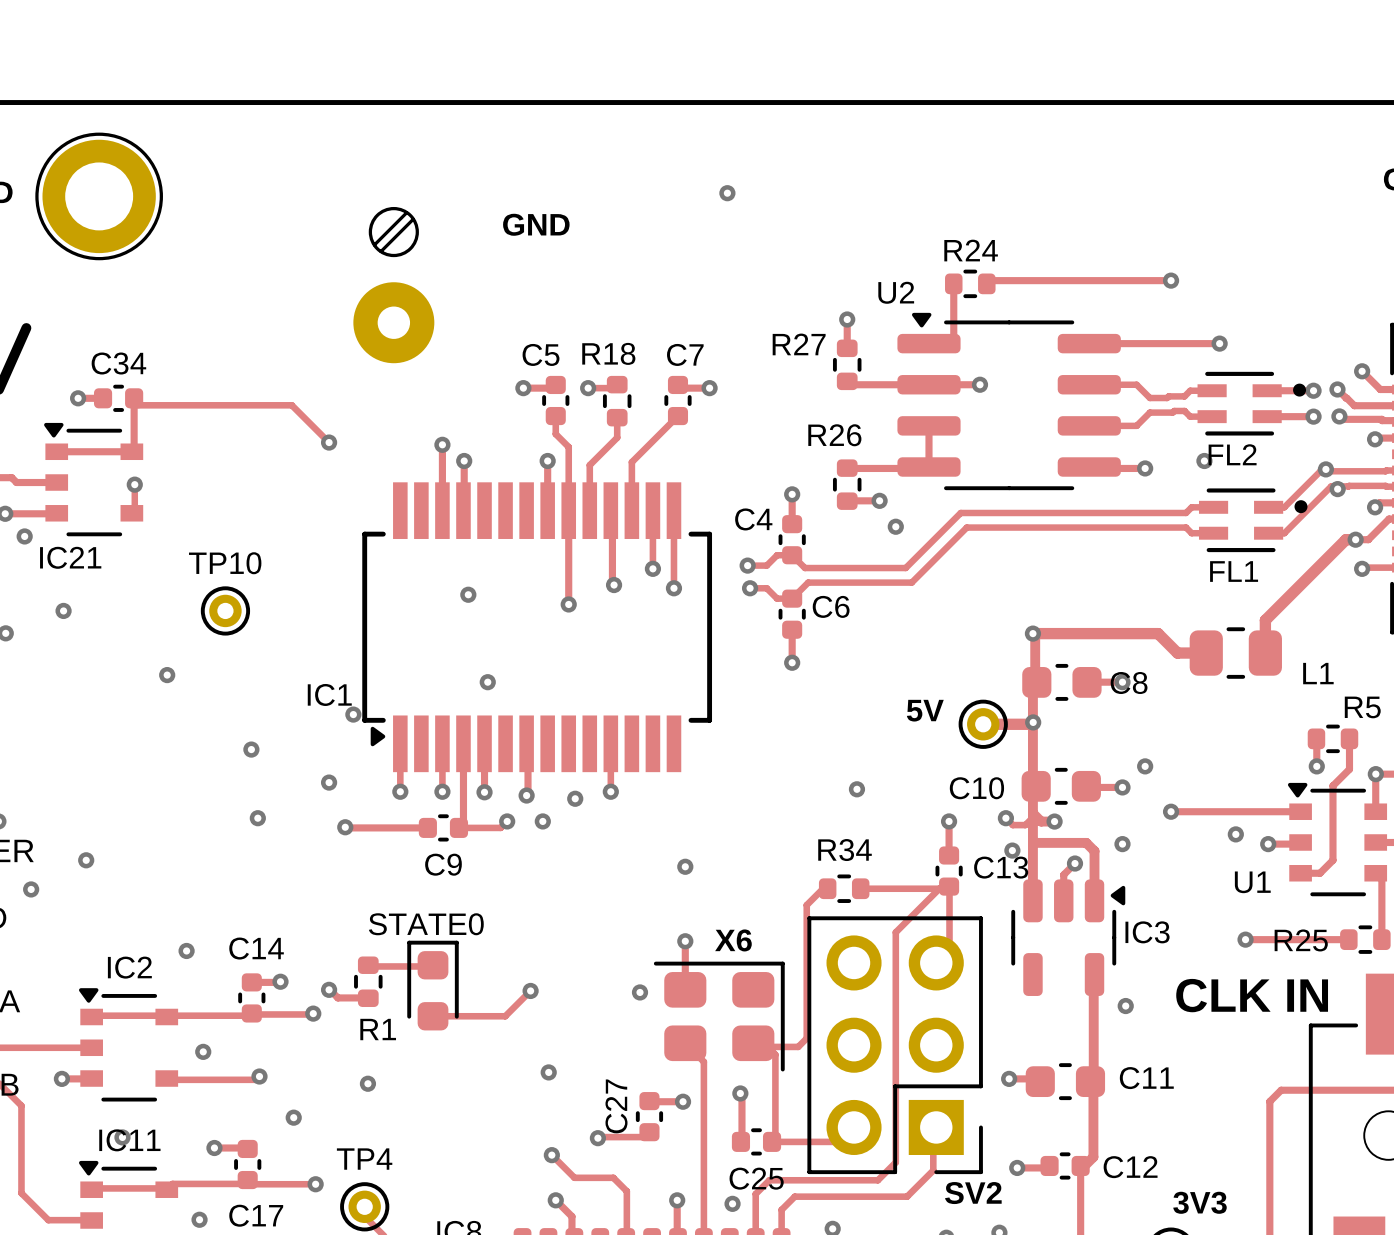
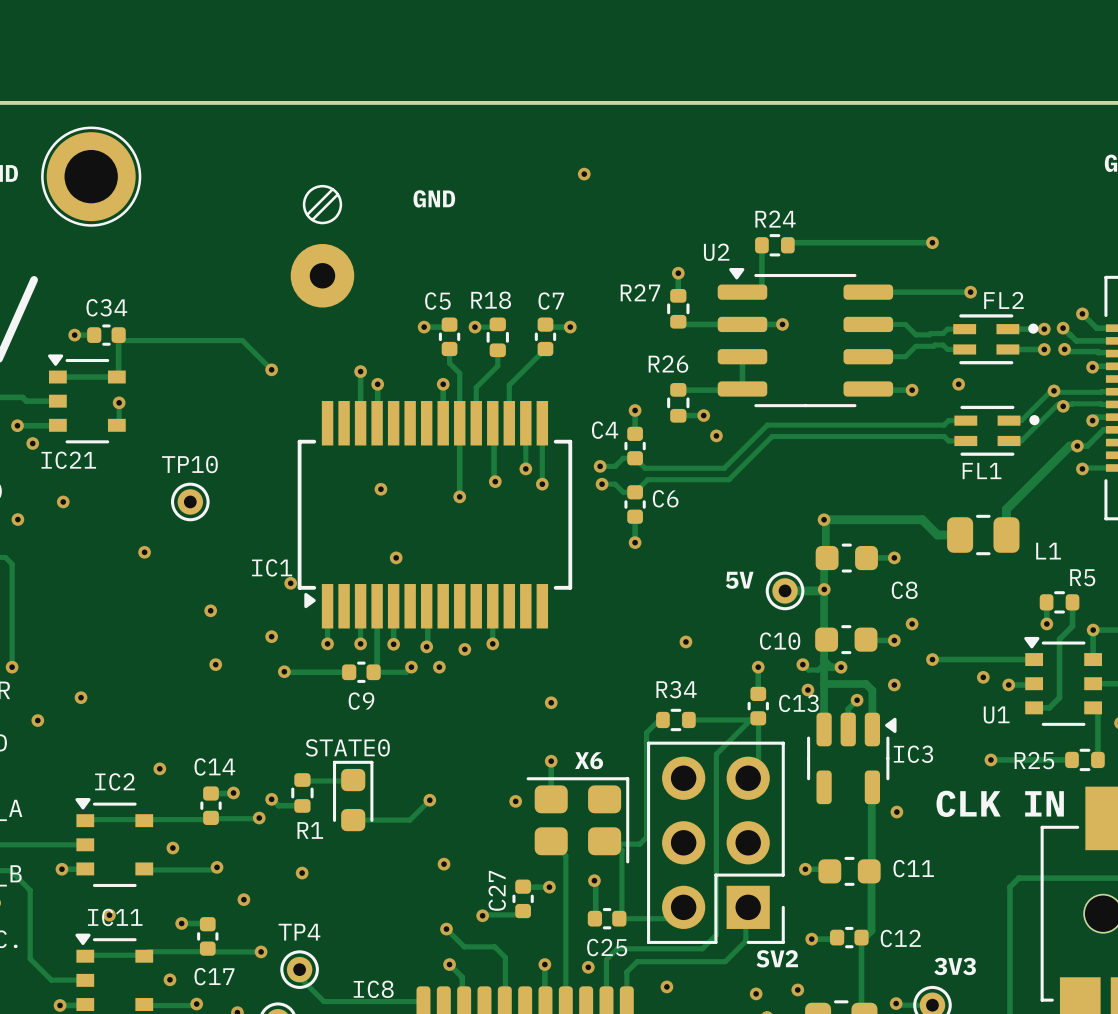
FL2 name position: FL2 (1232, 454) -> FL2 (1003, 300)
C8 name position: C8 (1129, 683) -> C8 (904, 590)

